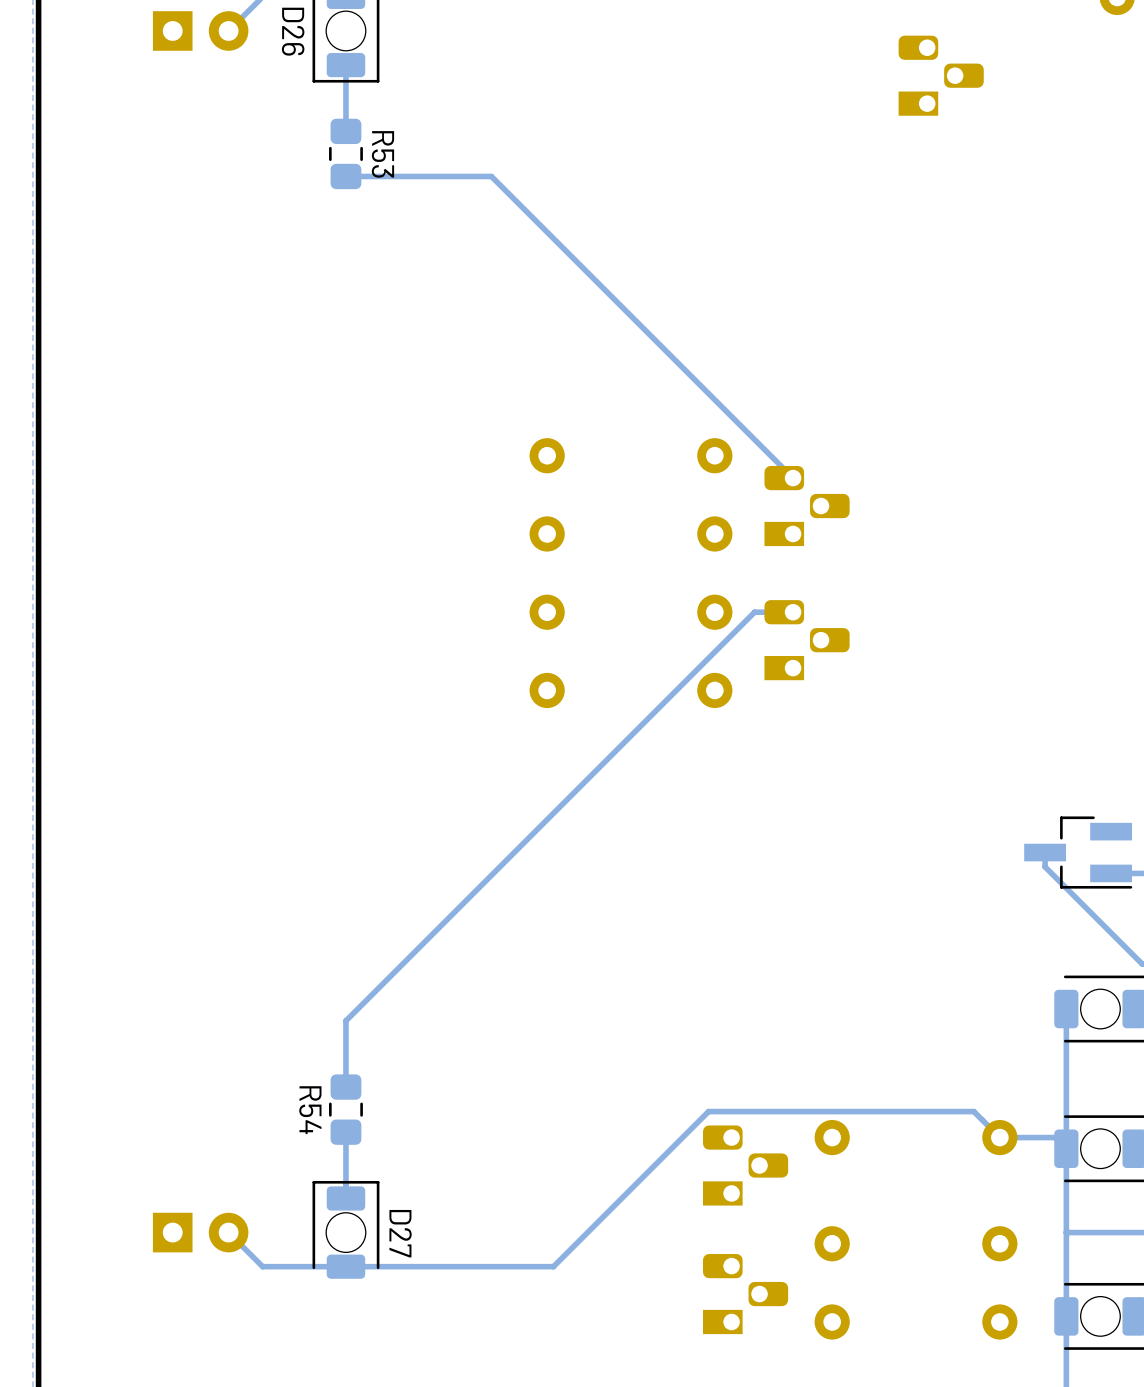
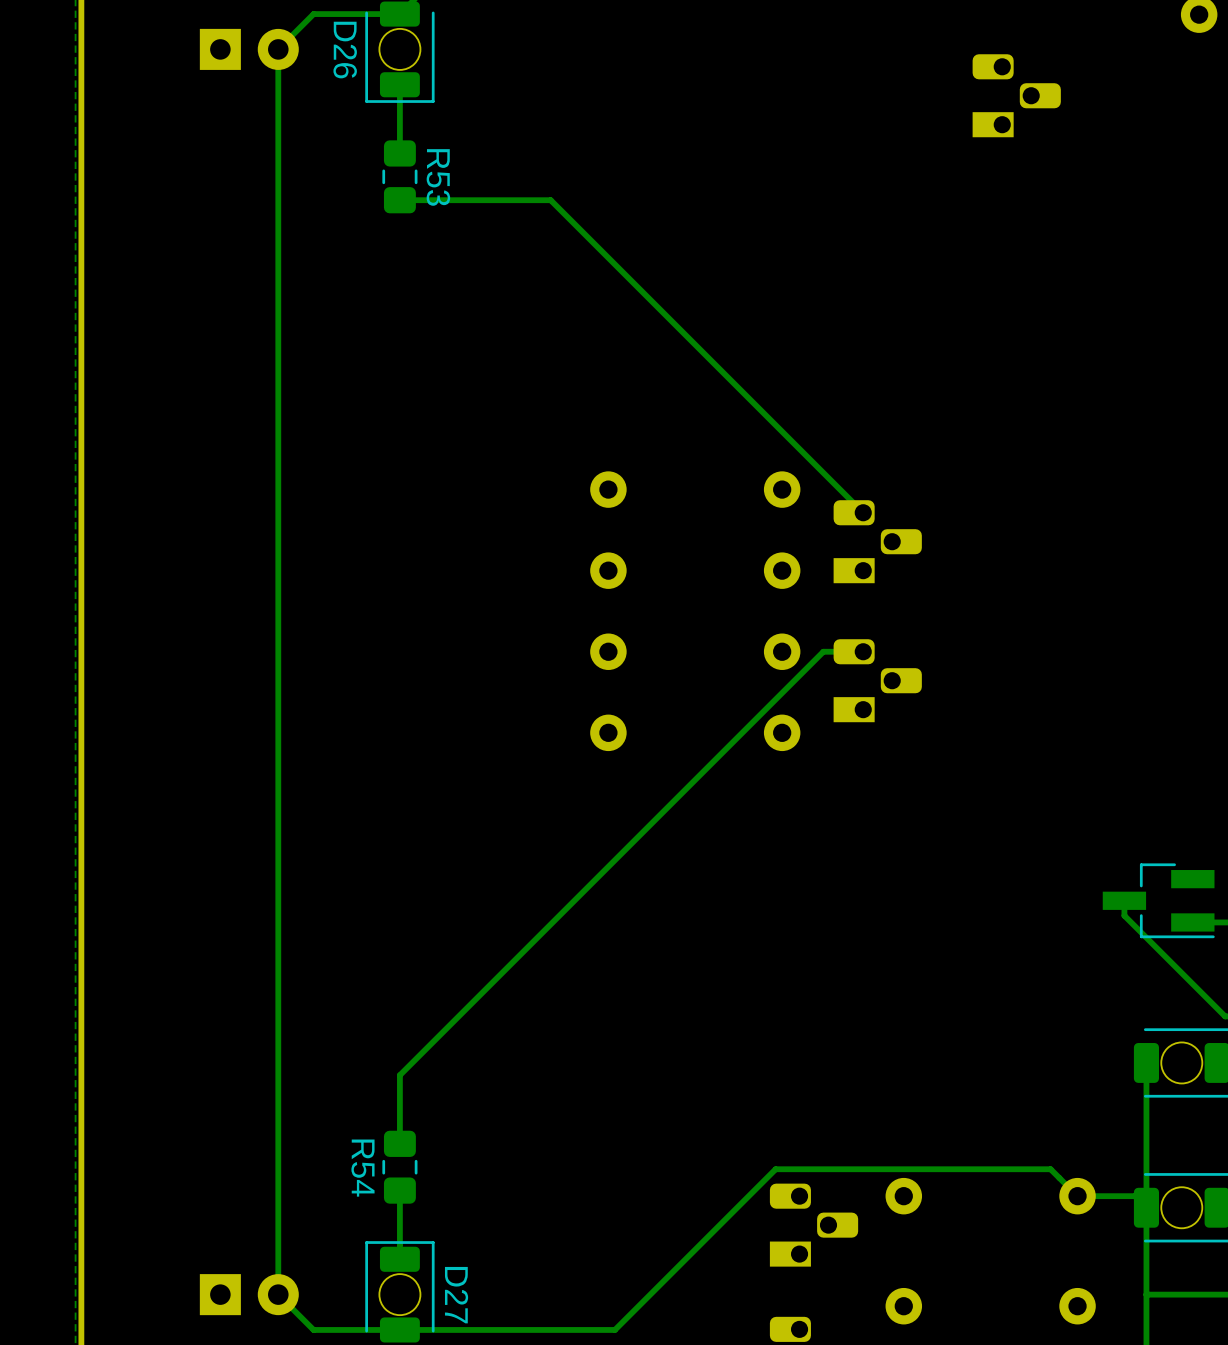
track: none -> (278, 49) (278, 1294)

